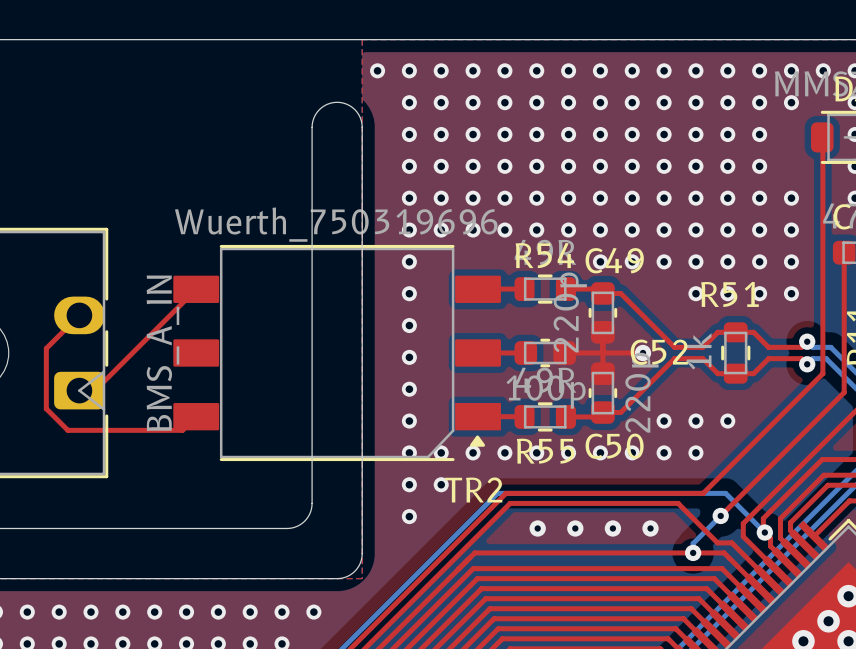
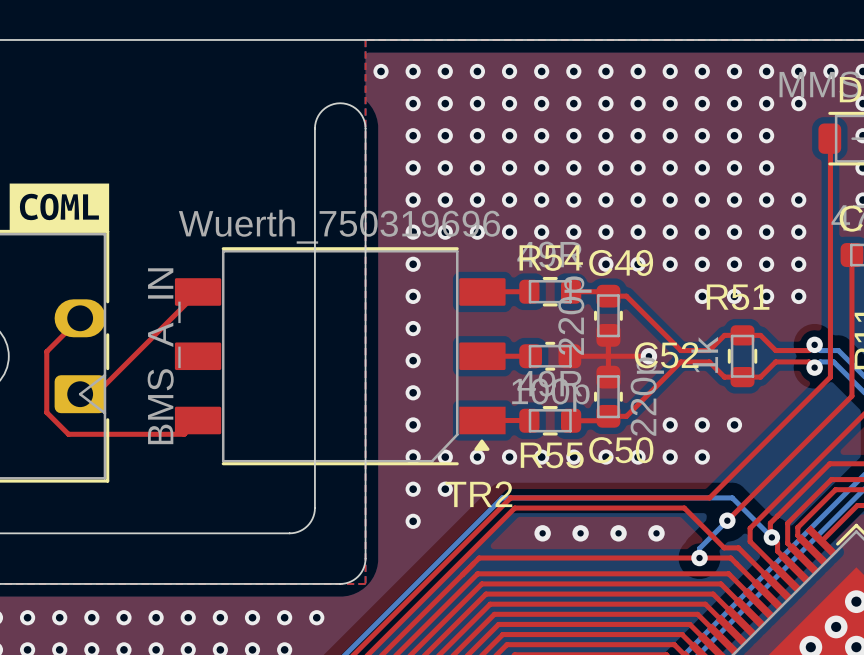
drawing: none -> [9, 183, 110, 231]

